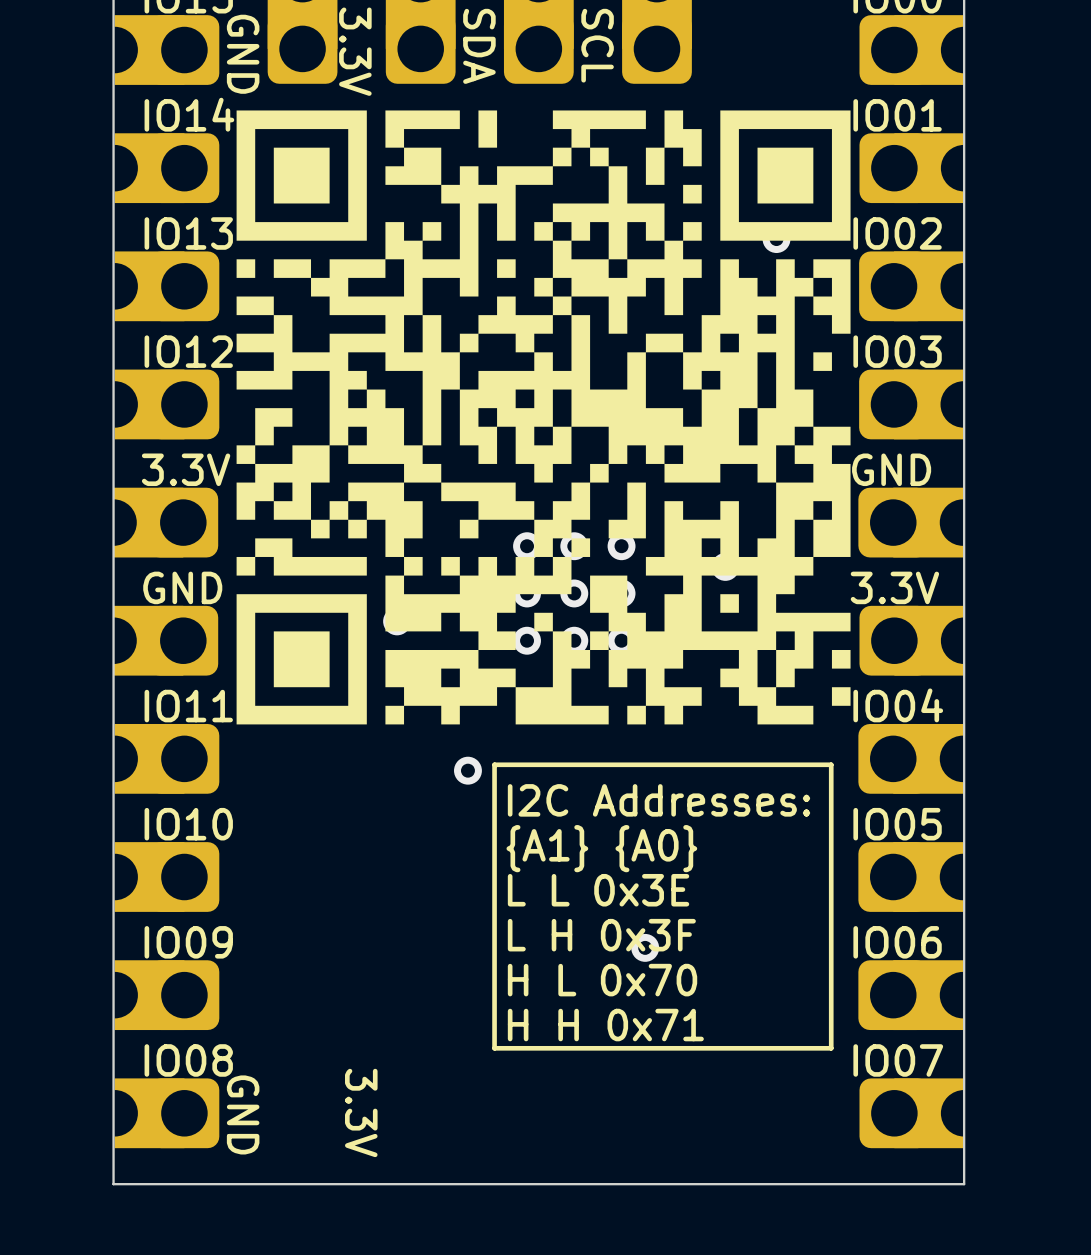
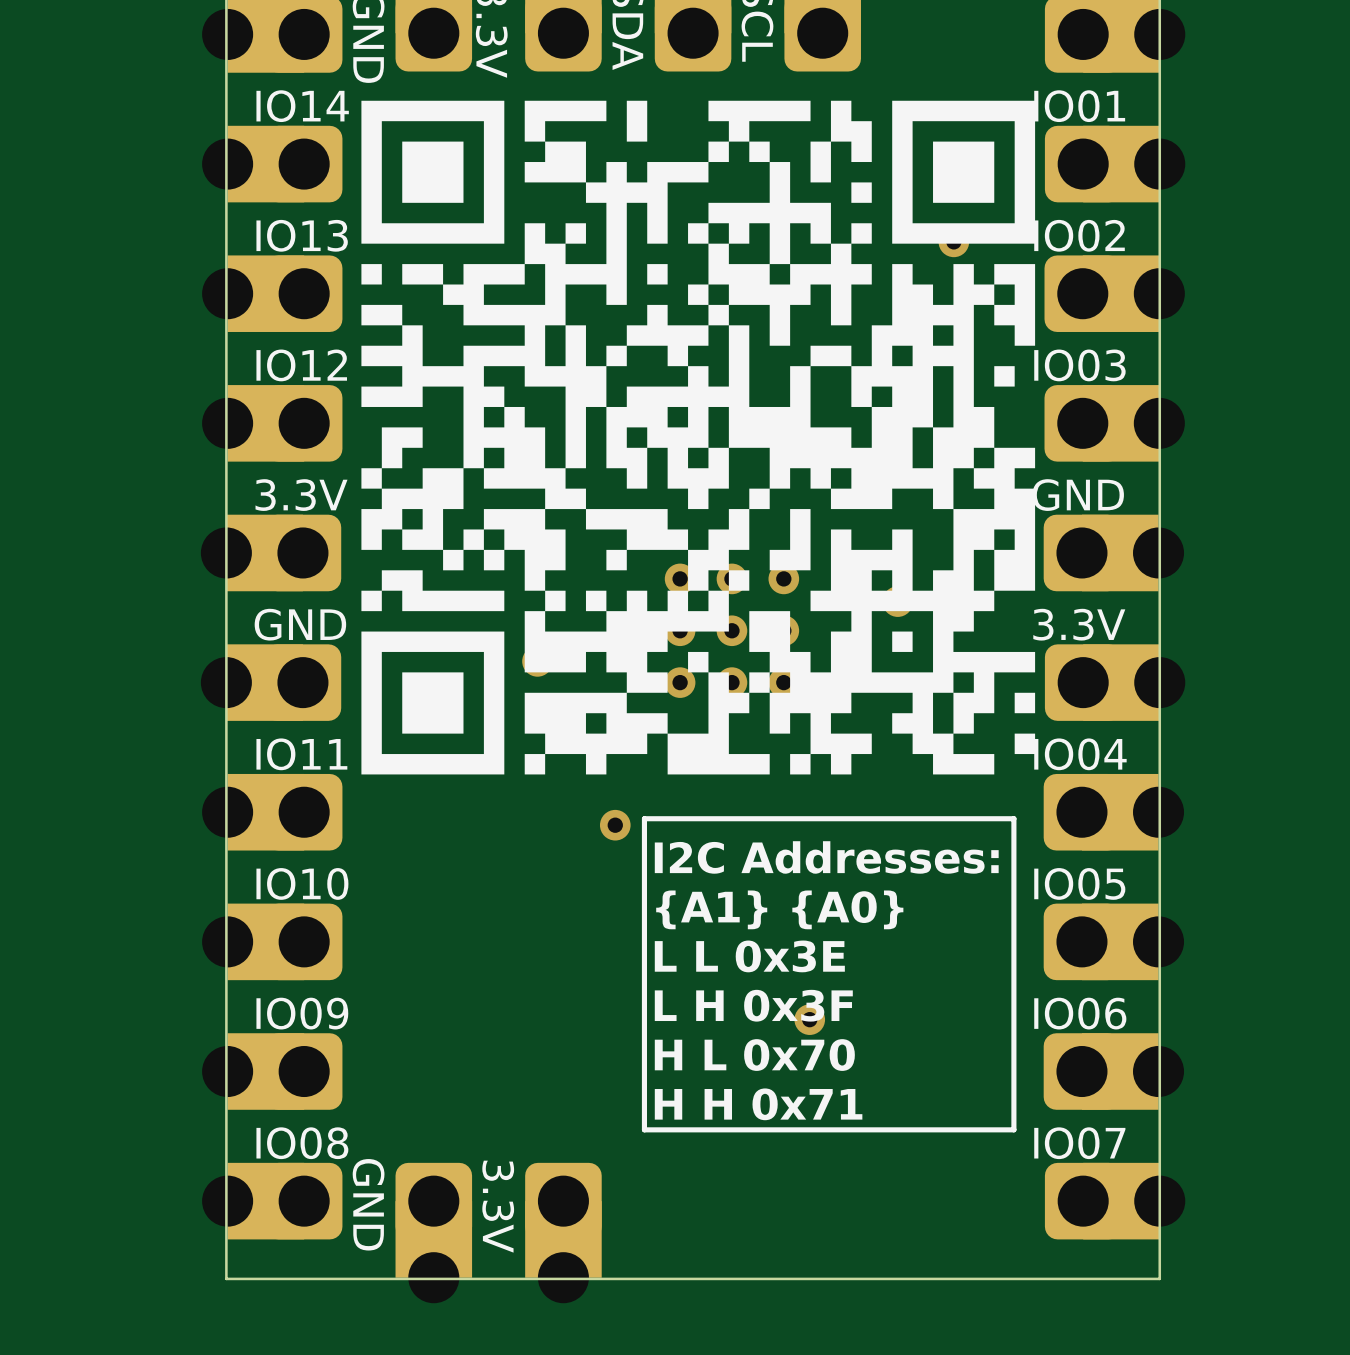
part: none -> (433, 1233)
part: none -> (563, 1233)

